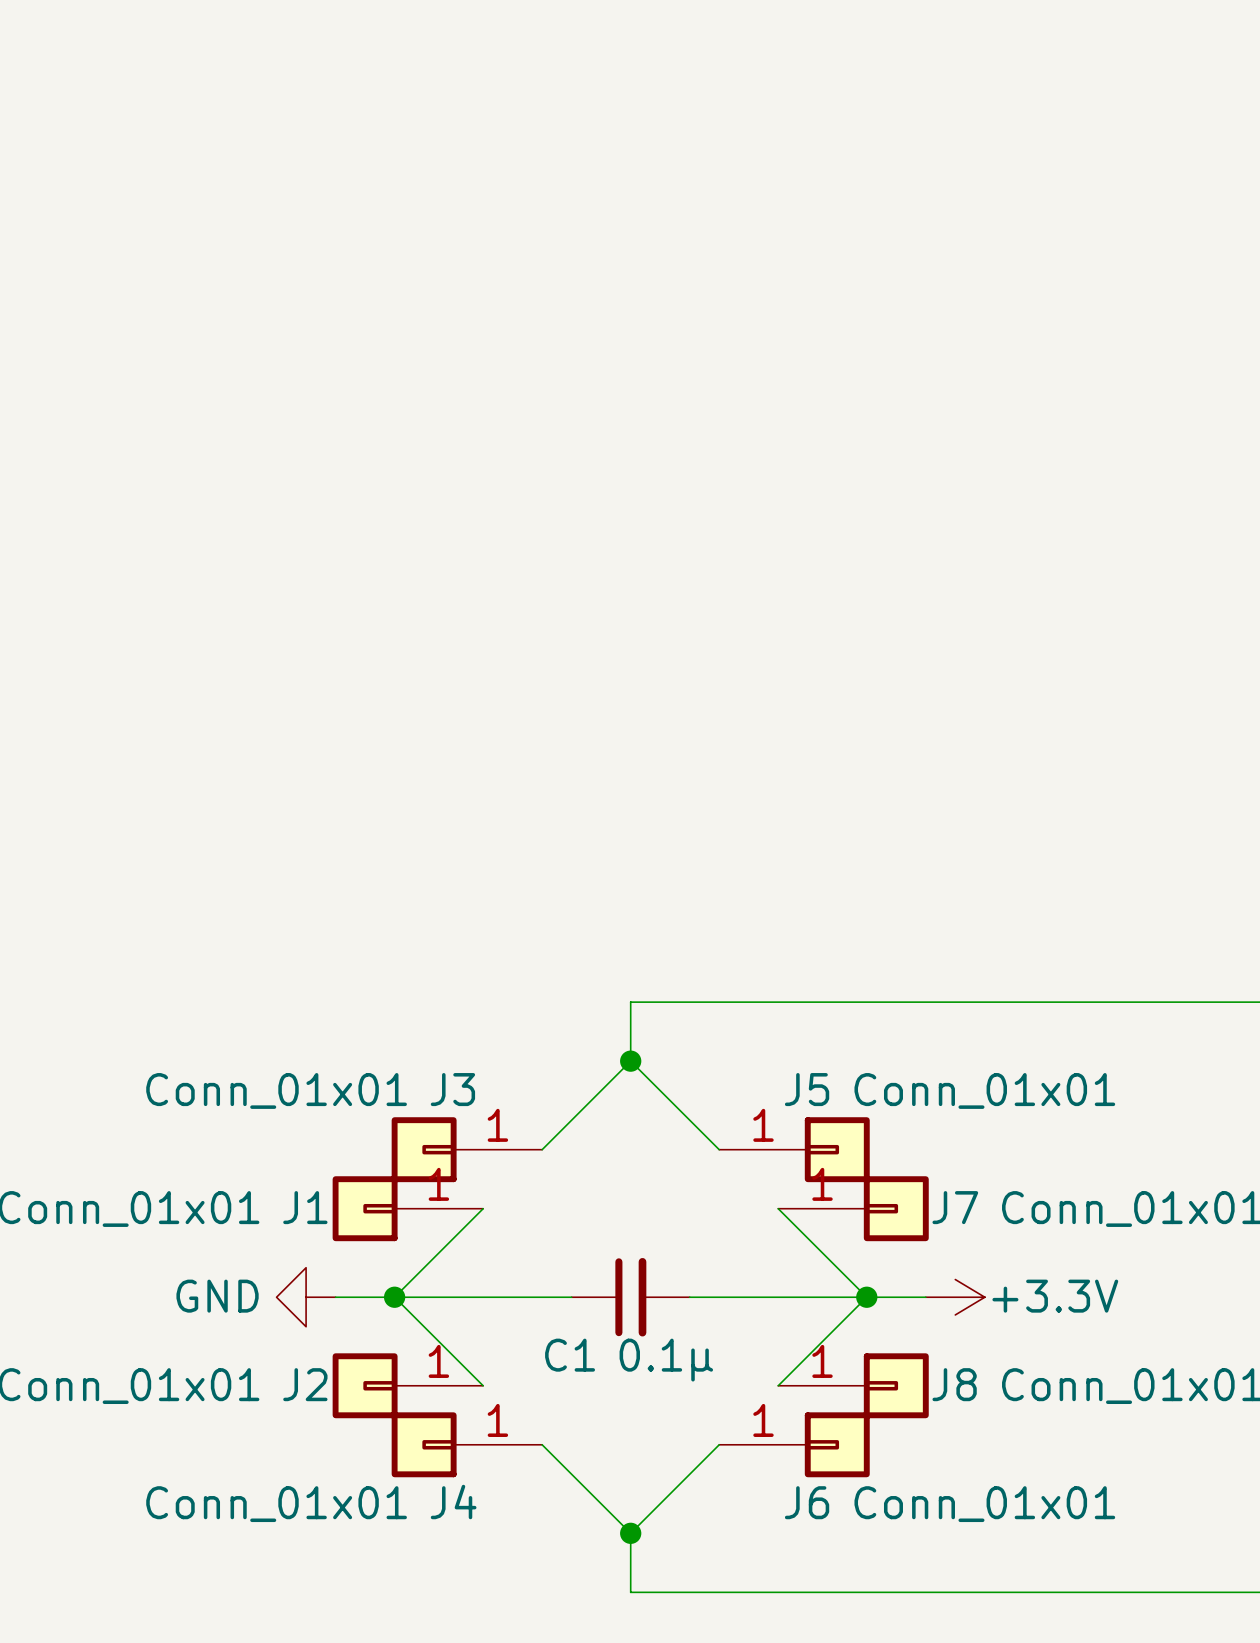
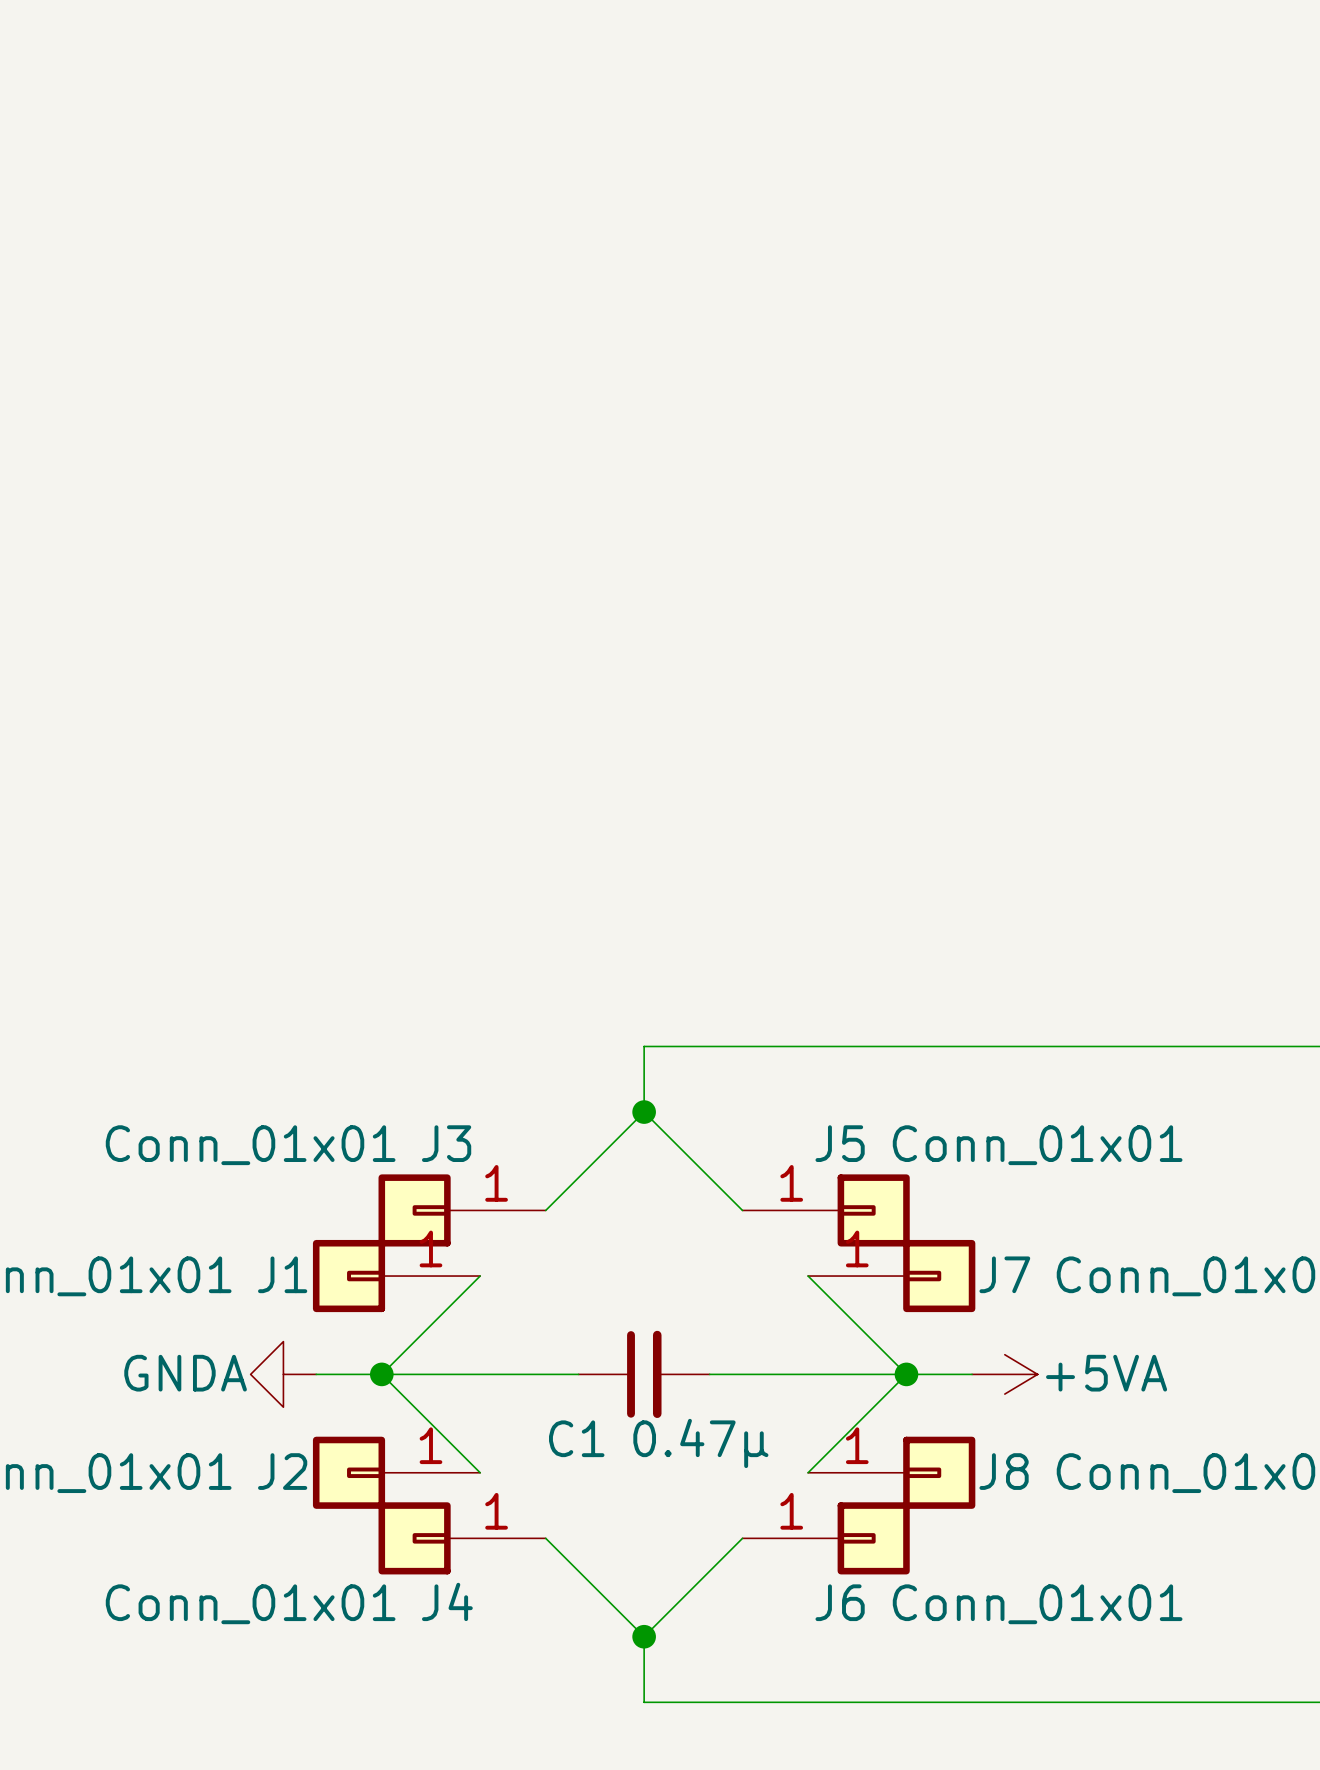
power symbol: GND (306, 1297) -> GNDA (283, 1374)
power symbol: +3.3V (955, 1297) -> +5VA (1004, 1374)
C1 value: 0.1μ (666, 1360) -> 0.47μ (700, 1443)

